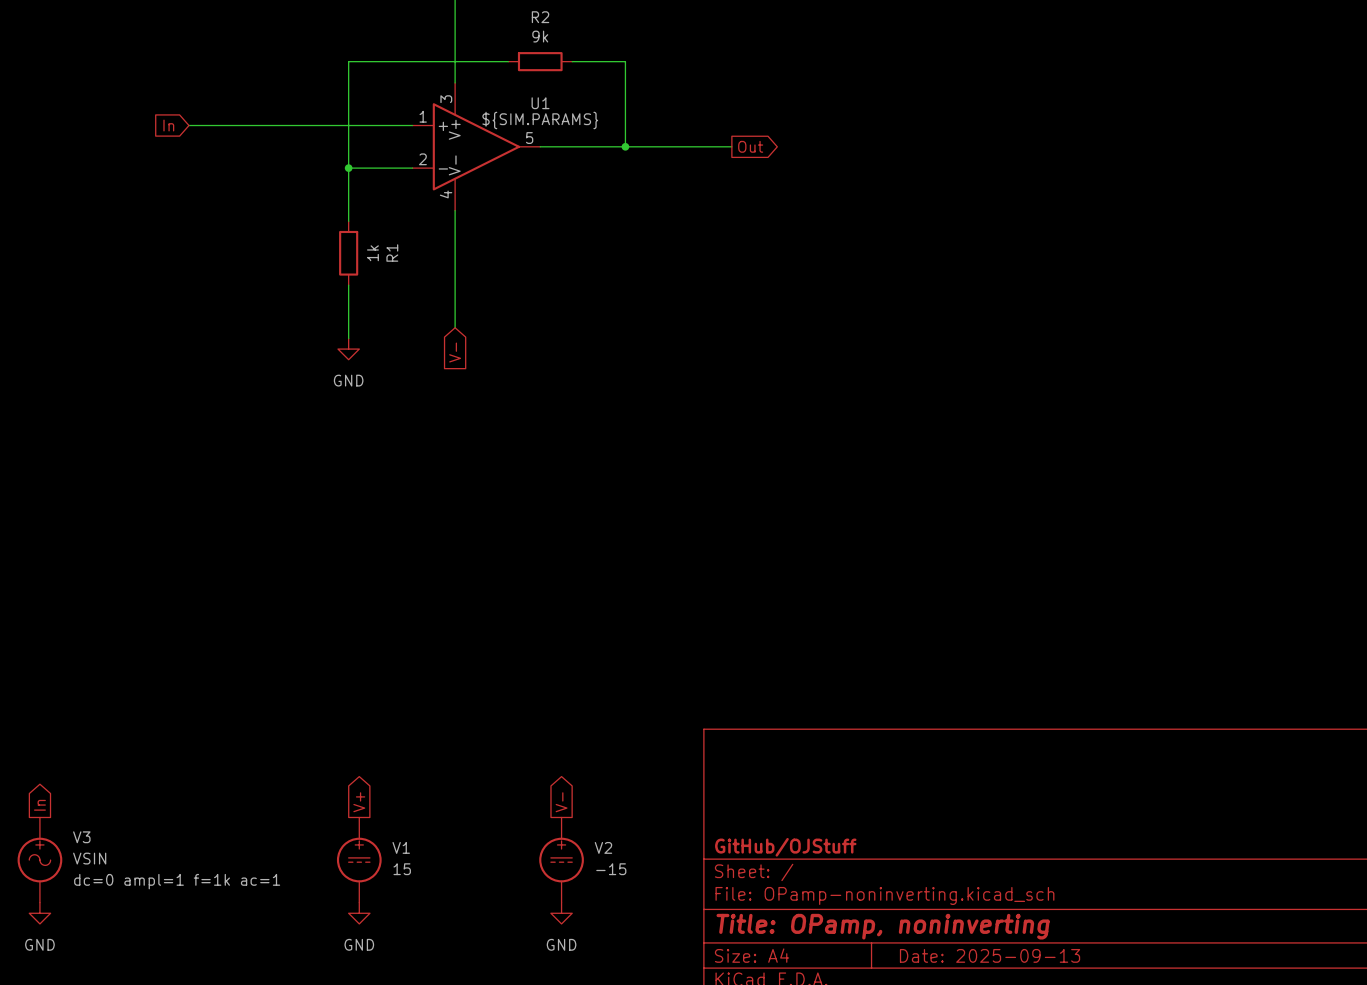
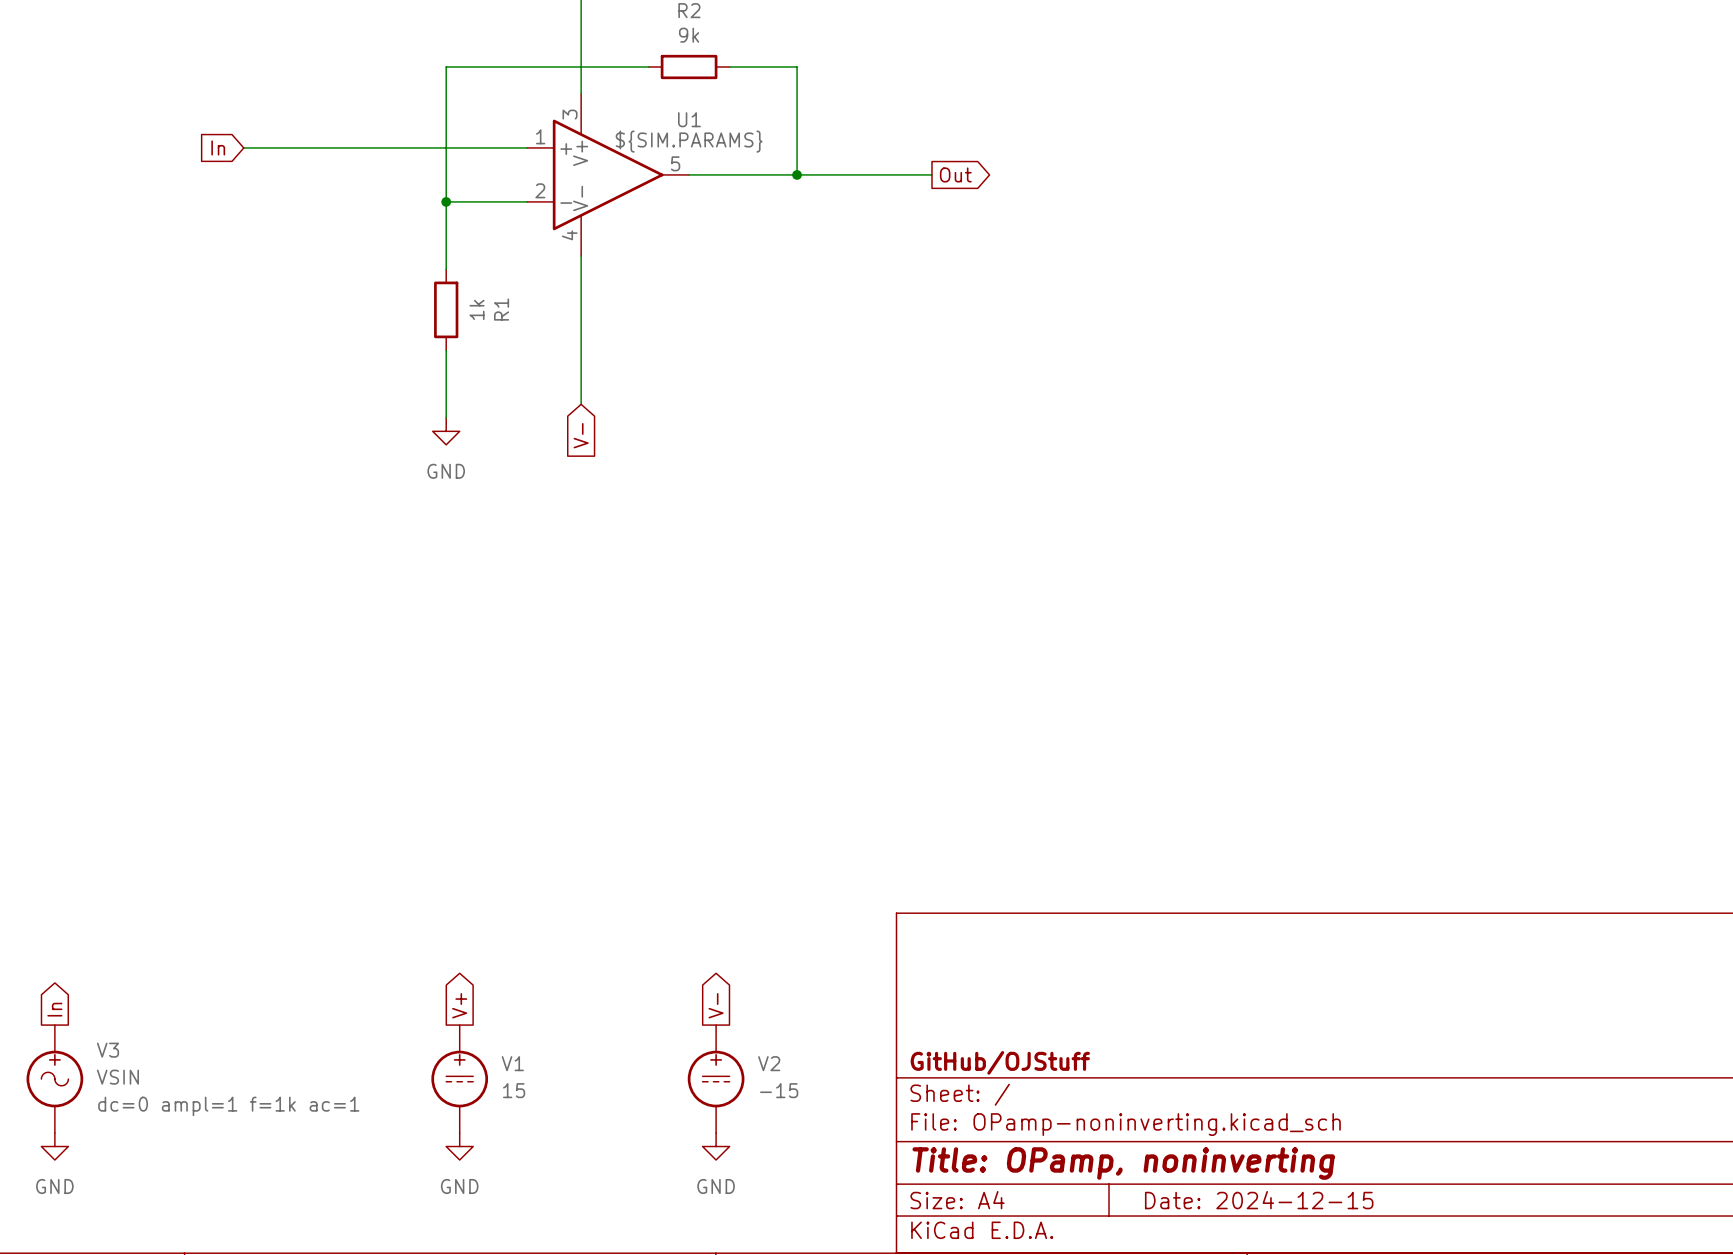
title block: Date: 2025-09-13 (990, 955) -> Date: 2024-12-15 (1259, 1200)

